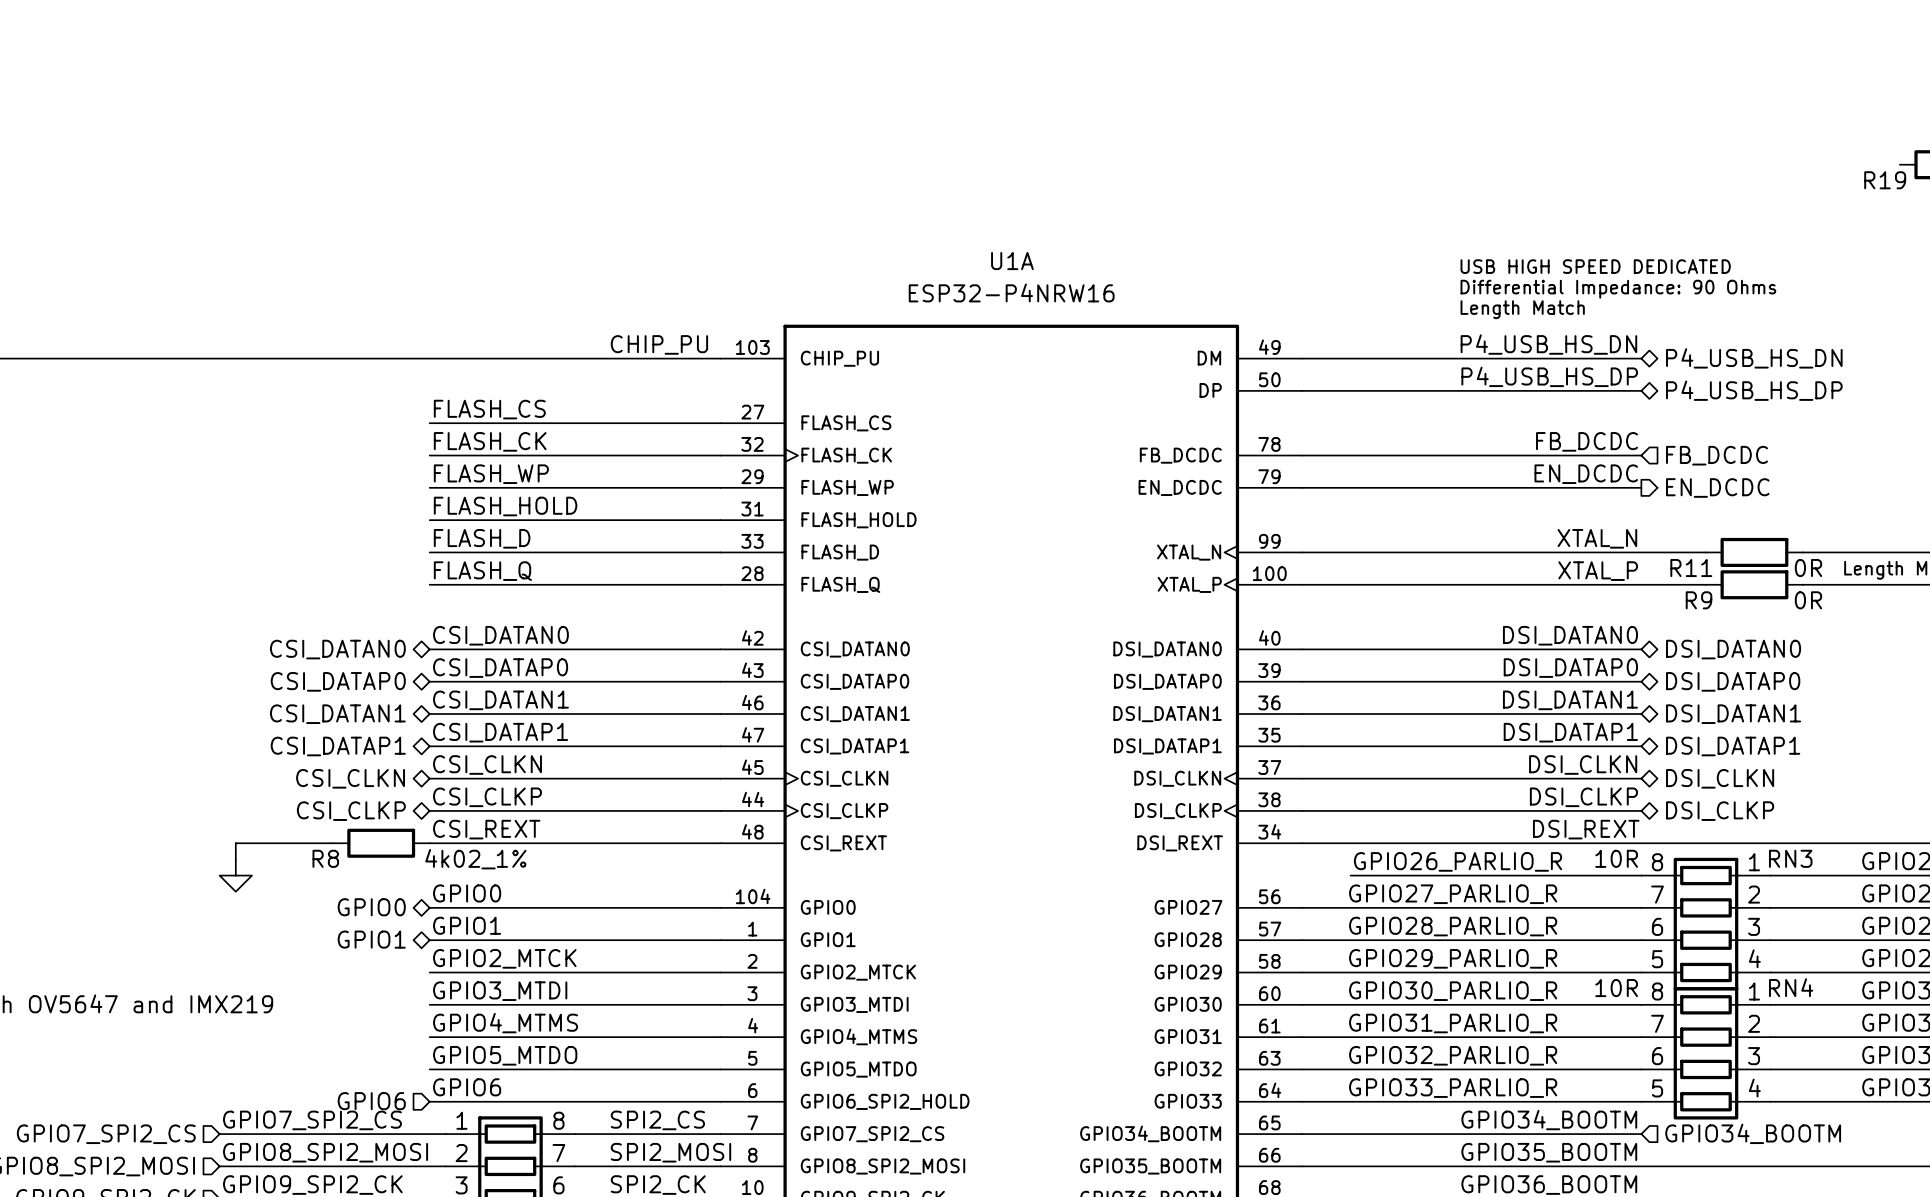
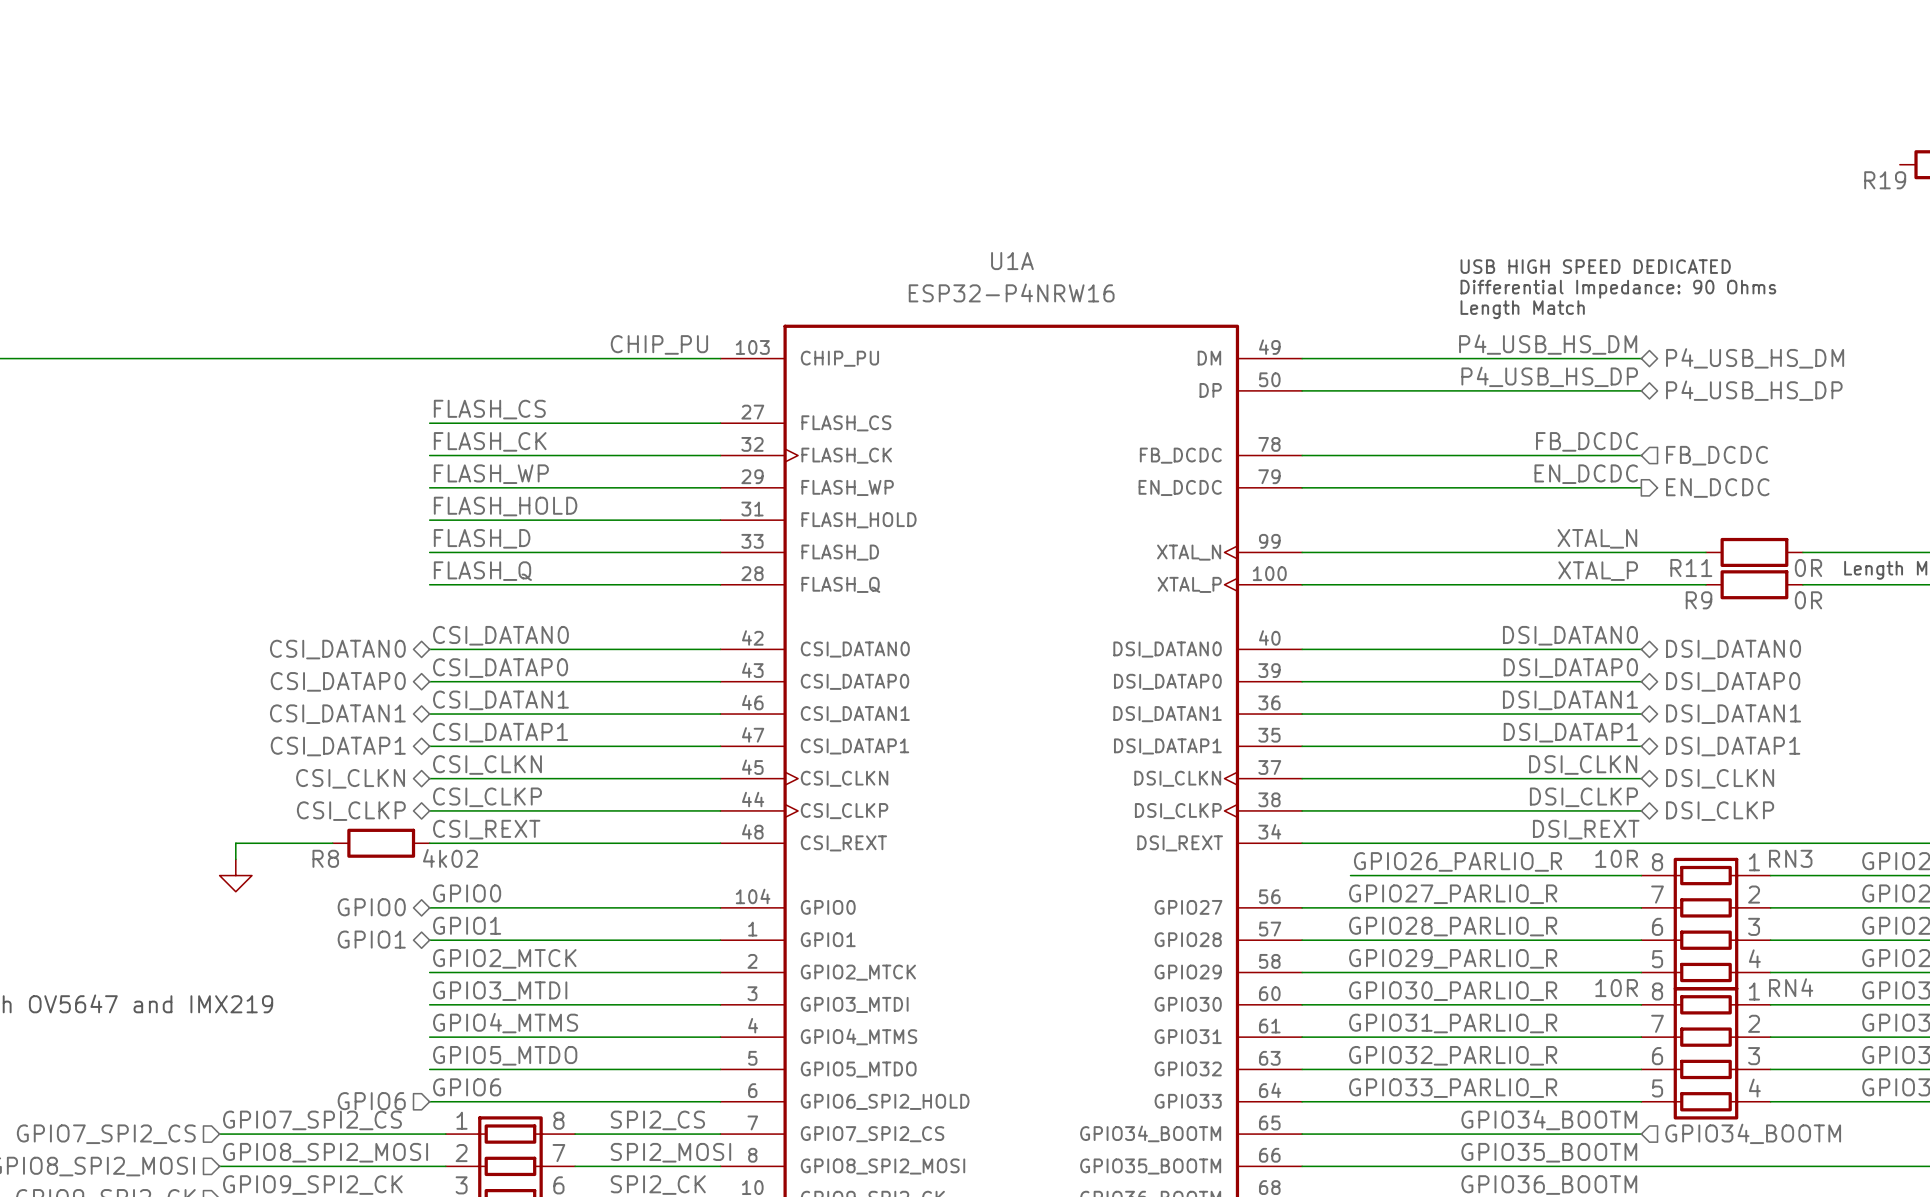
label: P4_USB_HS_DN (1548, 344) -> P4_USB_HS_DM (1548, 344)
hierarchical label: P4_USB_HS_DN (1754, 358) -> P4_USB_HS_DM (1755, 358)
R8 value: 4k02_1% (475, 859) -> 4k02 (450, 858)

